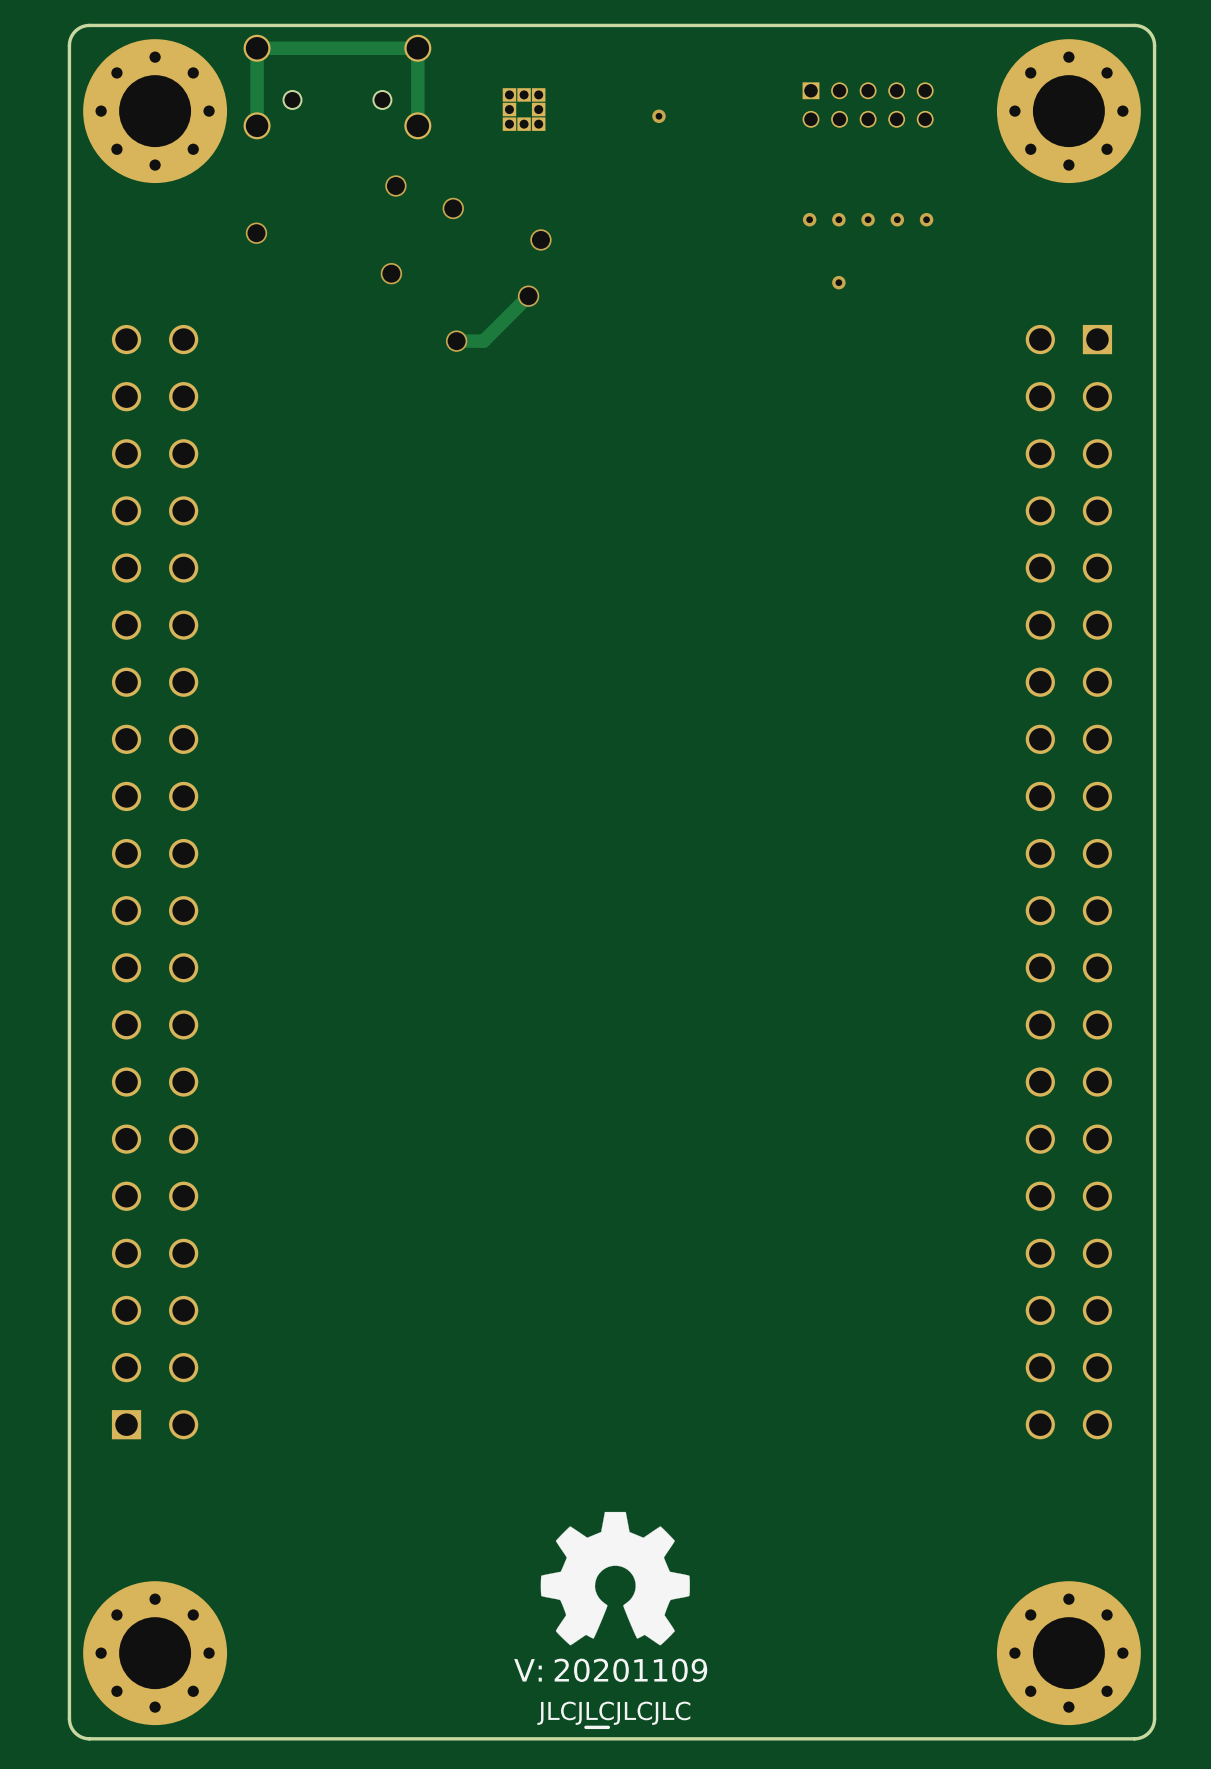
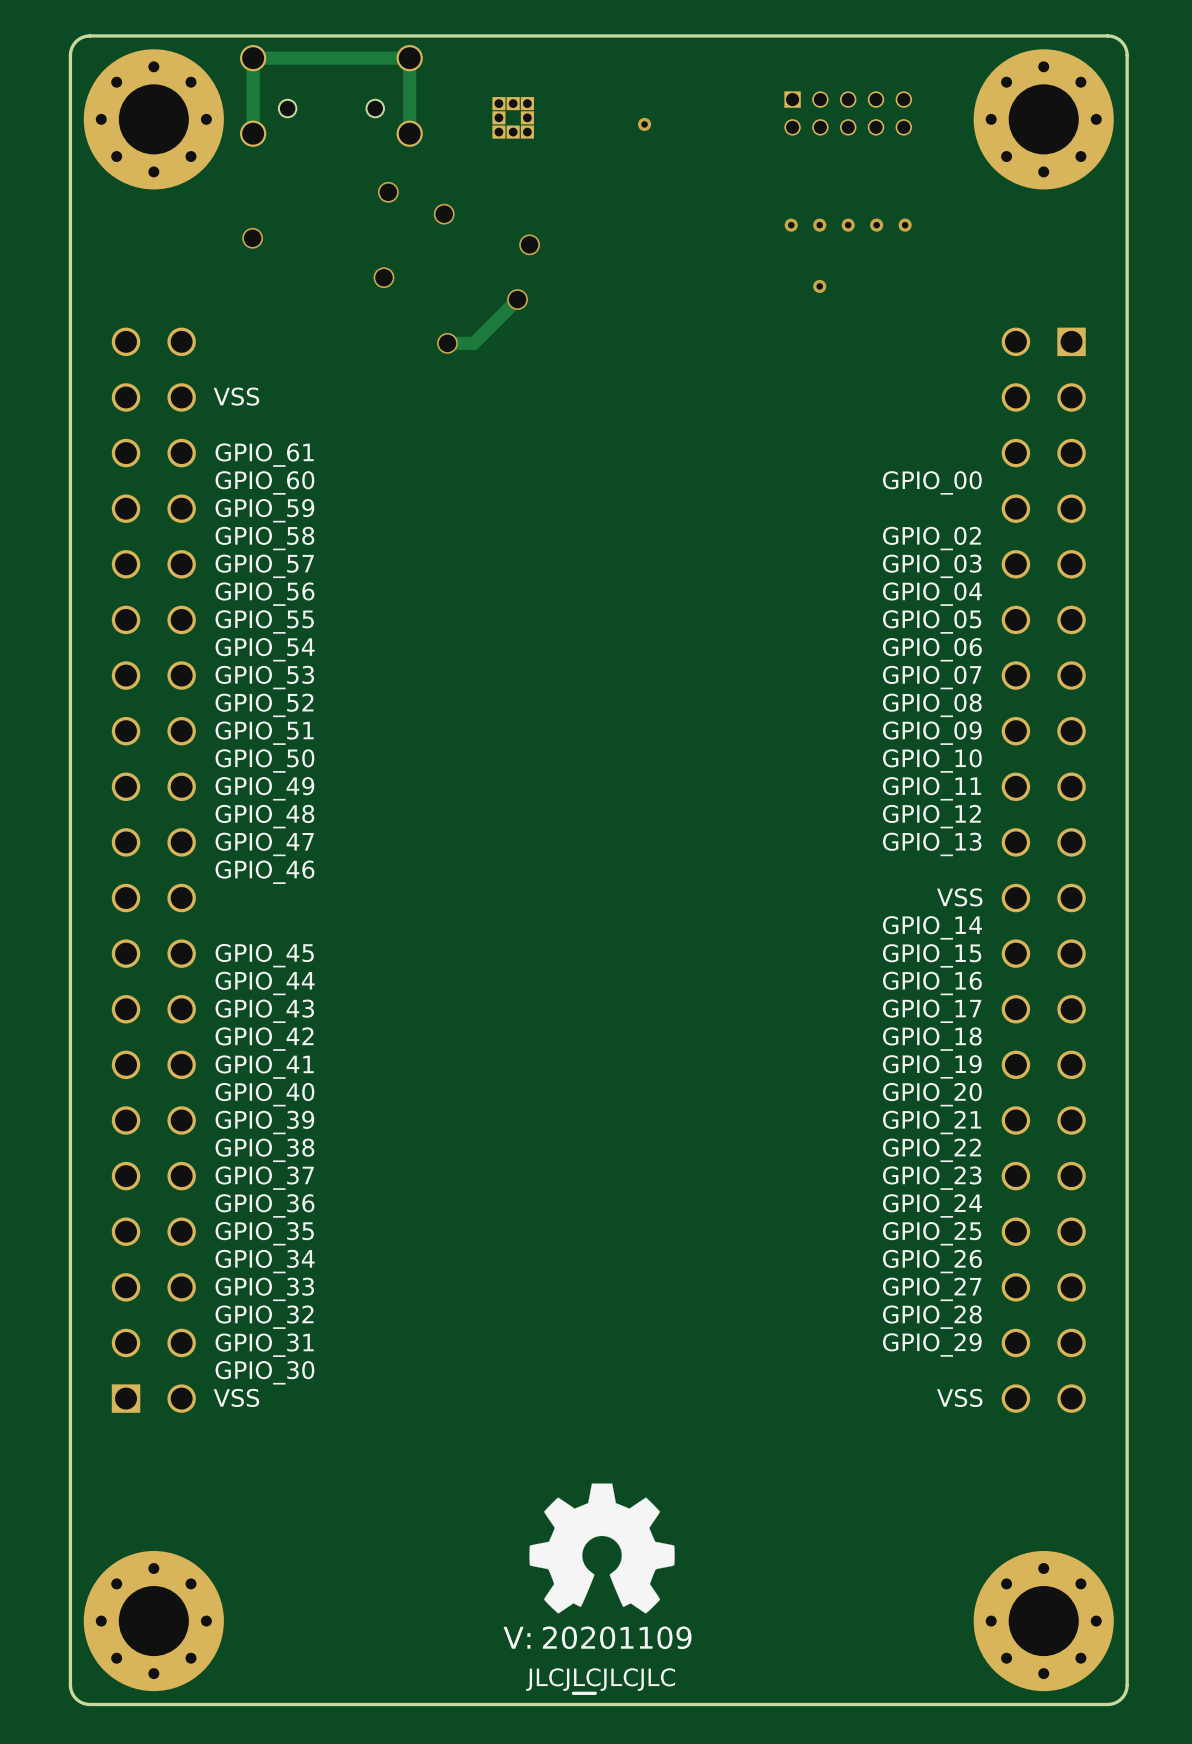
part footprint: [111, 324, 199, 1440] -> [111, 327, 196, 1413]
part footprint: [1025, 324, 1113, 1440] -> [1001, 327, 1086, 1413]

